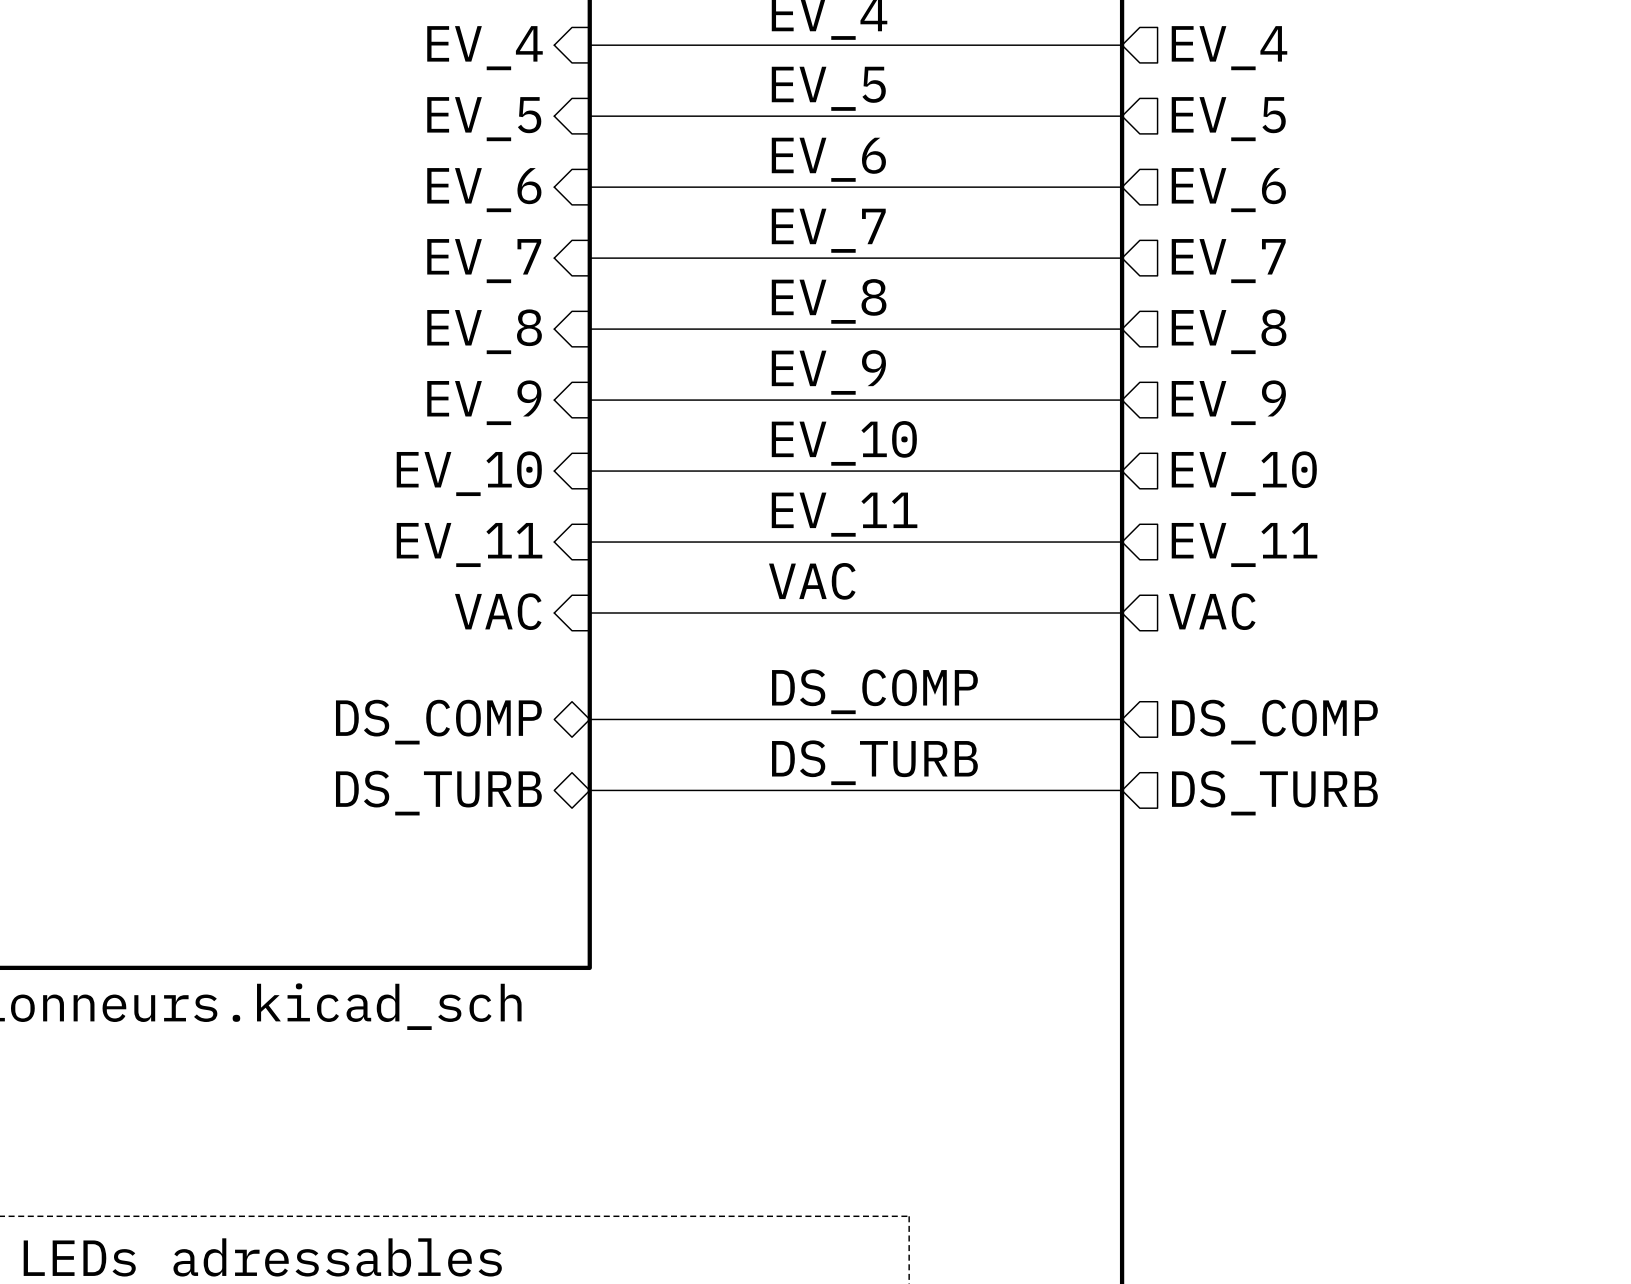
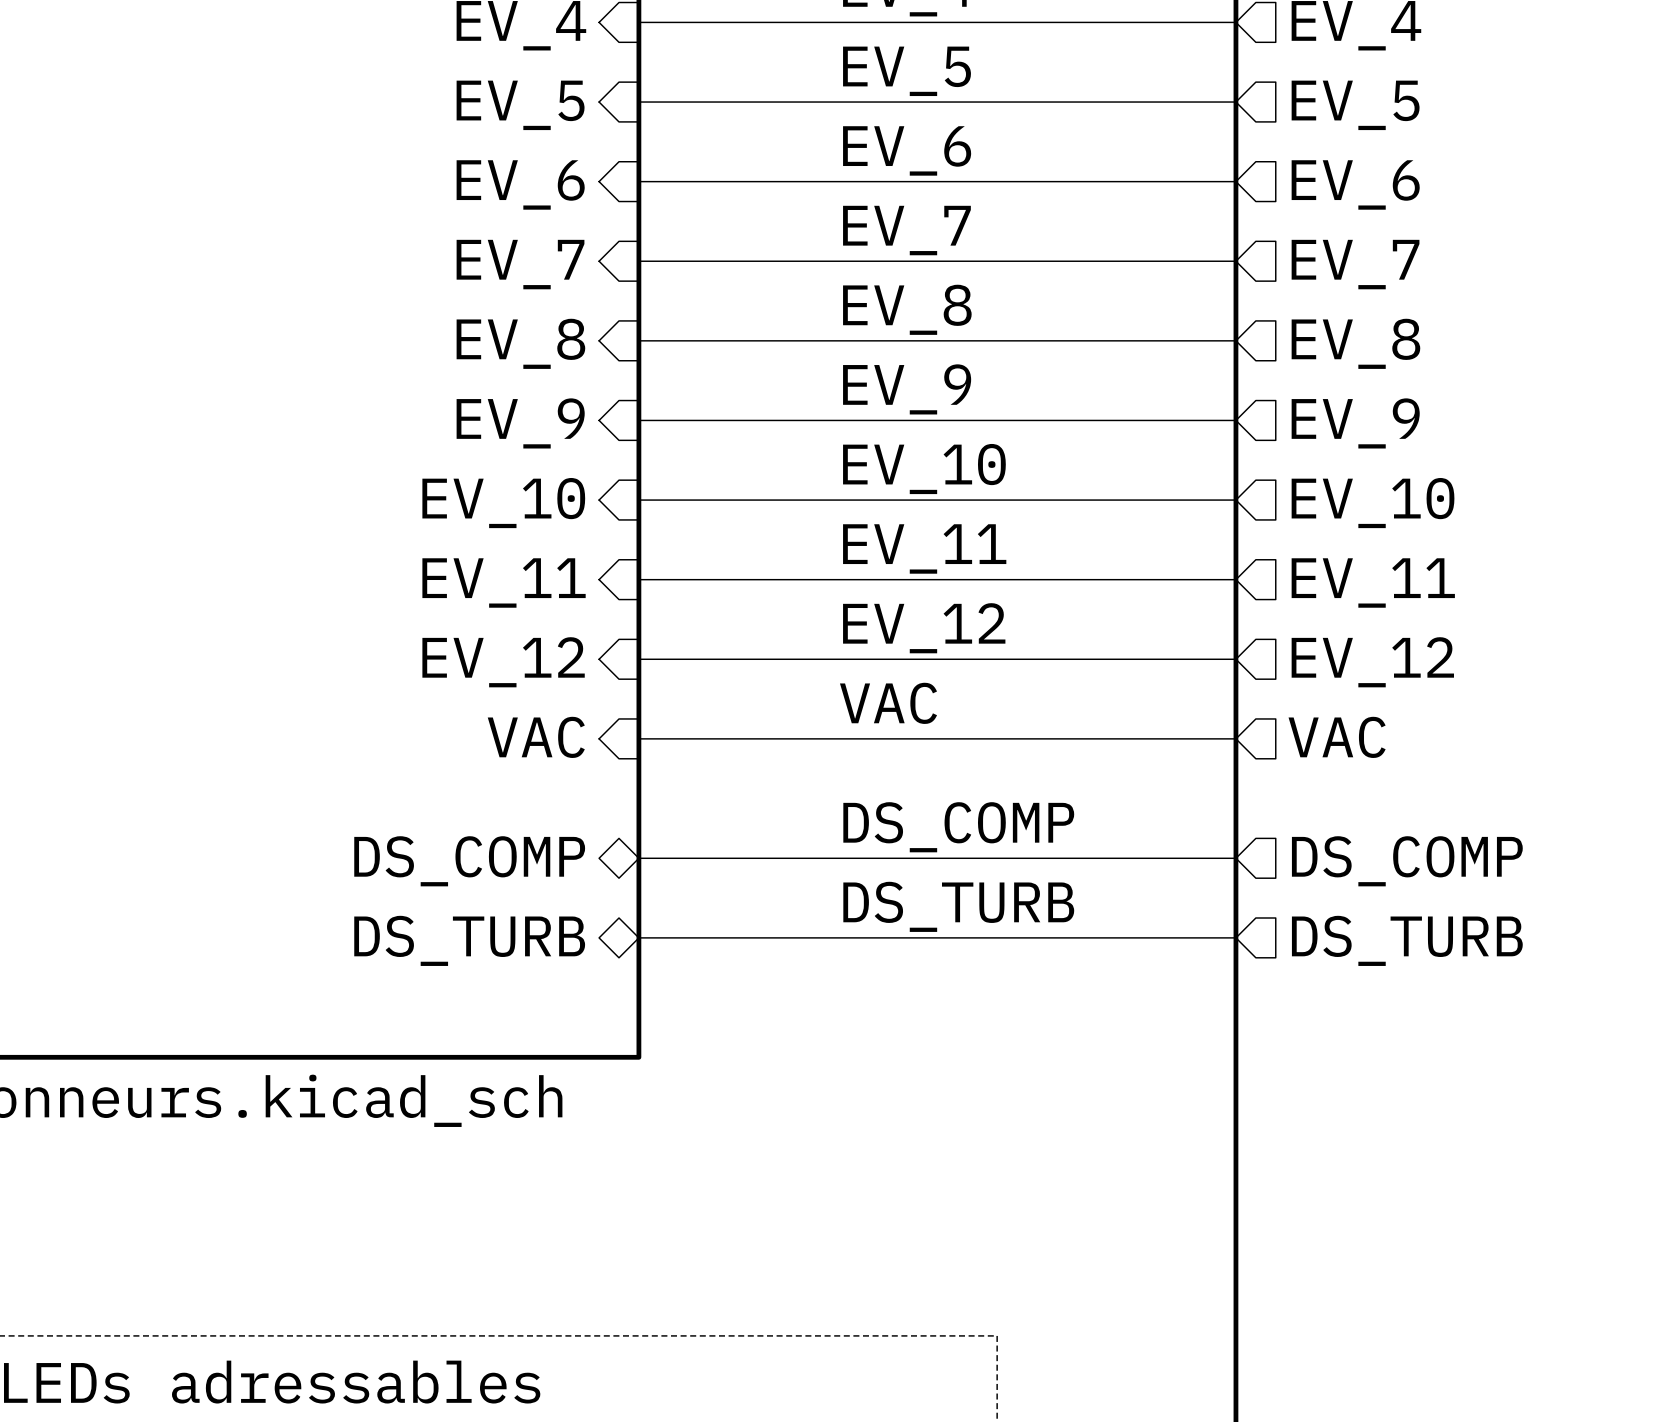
label: VAC (812, 581) -> EV_12 (924, 628)
sheet pin: VAC (498, 611) -> EV_12 (503, 662)
sheet pin: VAC (1212, 611) -> EV_12 (1372, 662)
label: none -> VAC (888, 703)
sheet pin: none -> VAC (536, 737)
sheet pin: none -> VAC (1337, 737)
label: DS_COMP (874, 691) -> none
wire: (589, 719) (1122, 719) -> (638, 738) (1235, 738)
sheet pin: DS_COMP (438, 722) -> none
sheet pin: DS_COMP (1274, 722) -> none
label: DS_TURB (874, 762) -> DS_COMP (958, 827)
sheet pin: DS_TURB (438, 793) -> DS_COMP (469, 861)
sheet pin: DS_TURB (1274, 793) -> DS_COMP (1407, 861)
label: none -> DS_TURB (958, 906)
wire: none -> (638, 937) (1235, 937)
sheet pin: none -> DS_TURB (469, 940)
sheet pin: none -> DS_TURB (1407, 940)

